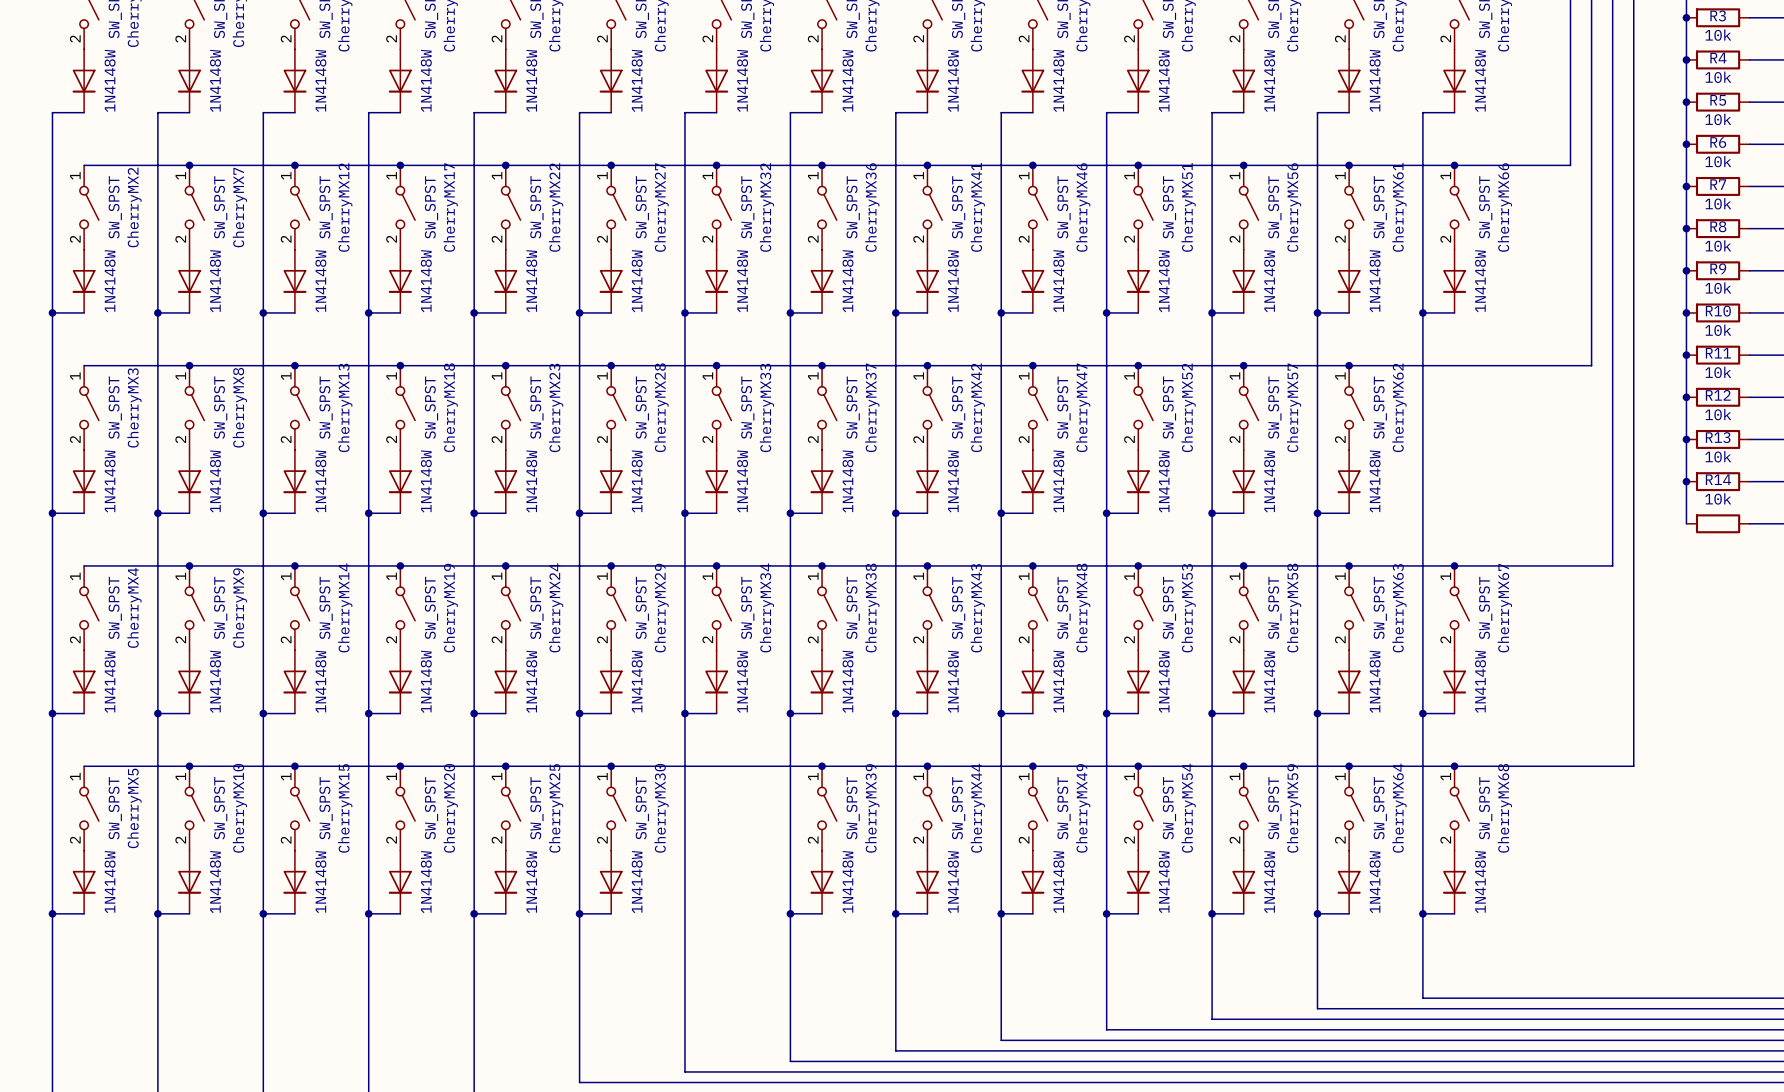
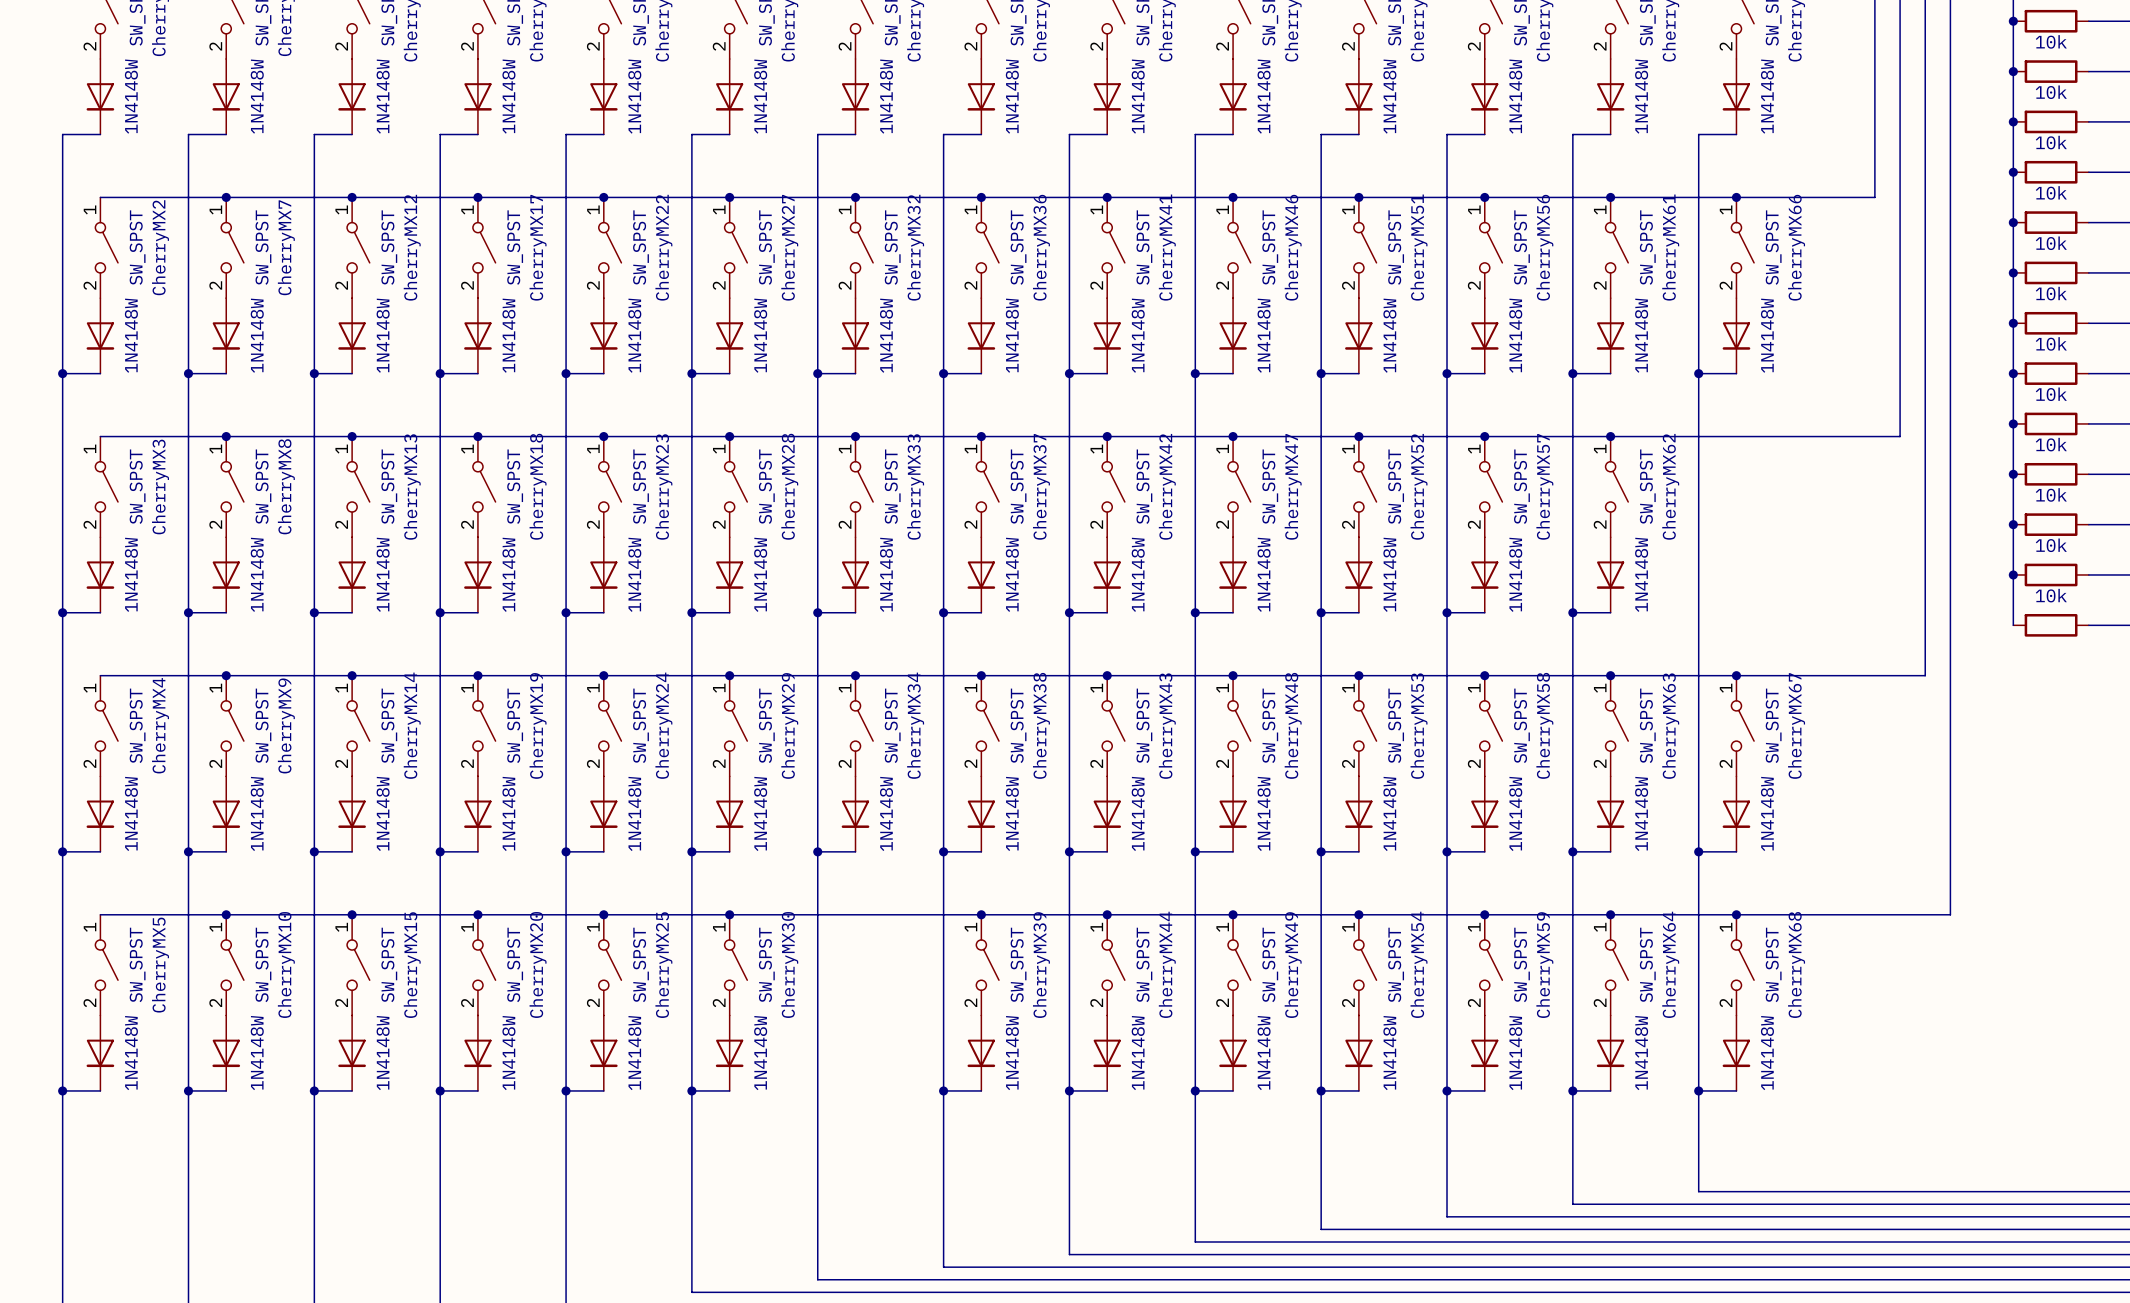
R3 name: R3 (1718, 15) -> none
R4 name: R4 (1718, 58) -> none
R5 name: R5 (1718, 100) -> none
R6 name: R6 (1718, 142) -> none
R7 name: R7 (1718, 184) -> none
R8 name: R8 (1718, 226) -> none
R9 name: R9 (1718, 268) -> none
R10 name: R10 (1718, 311) -> none
R11 name: R11 (1718, 353) -> none
R12 name: R12 (1718, 395) -> none
R13 name: R13 (1718, 437) -> none
R14 name: R14 (1718, 479) -> none

